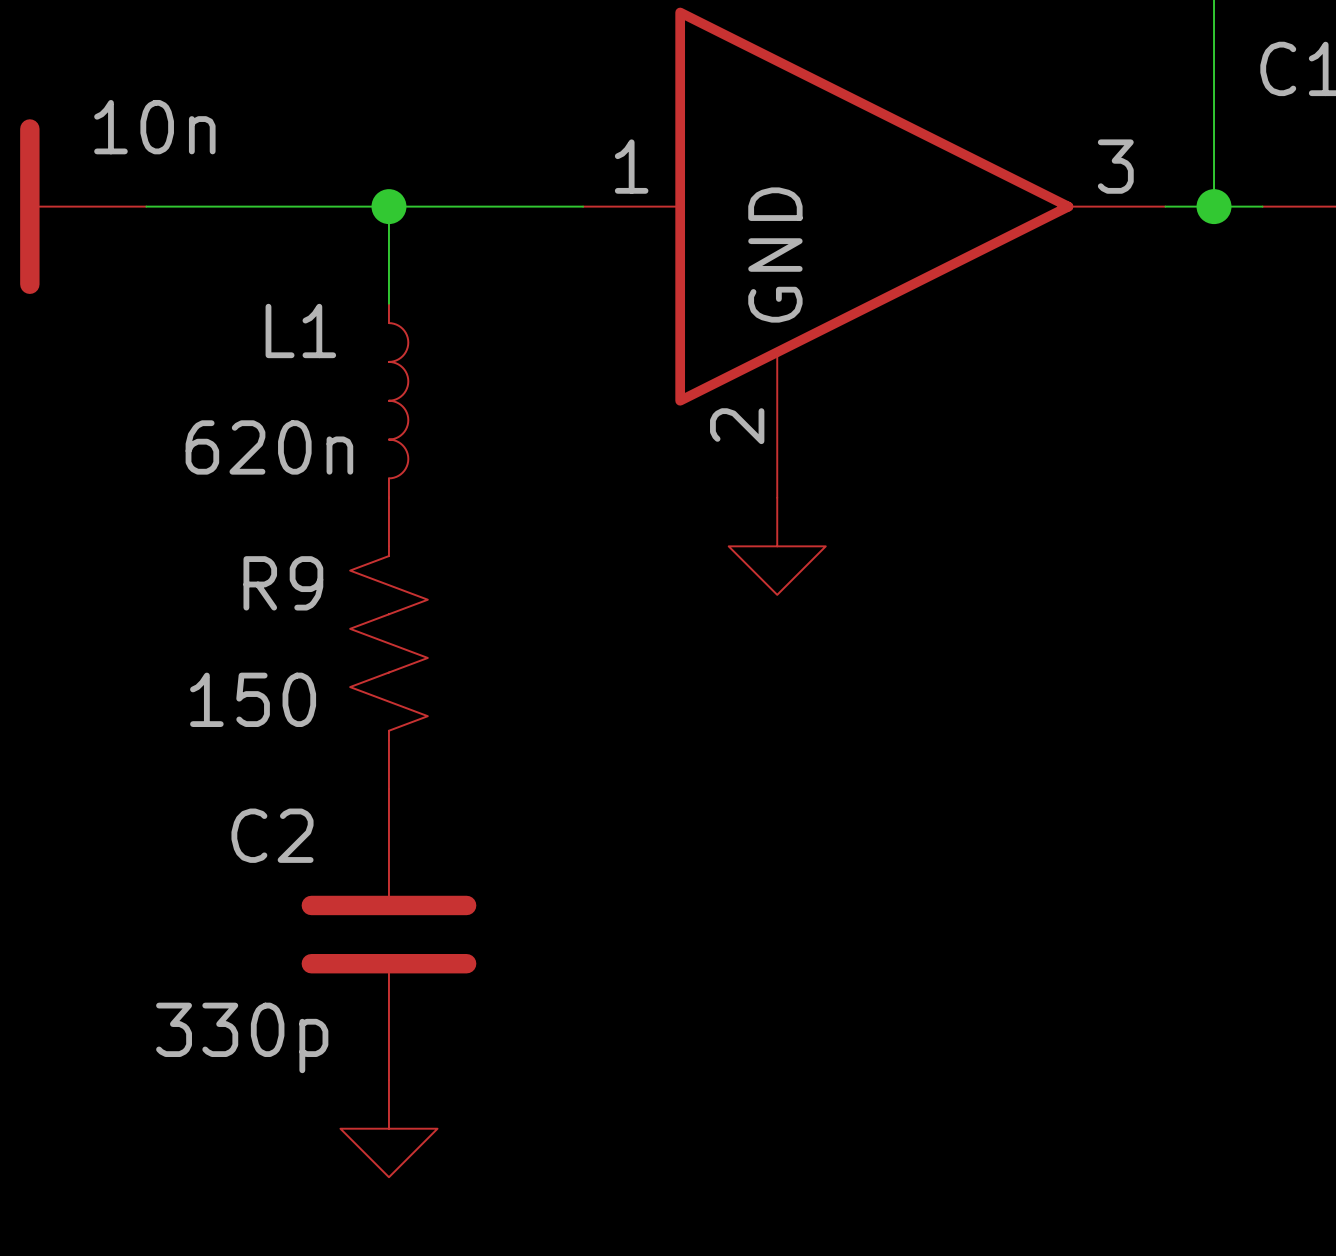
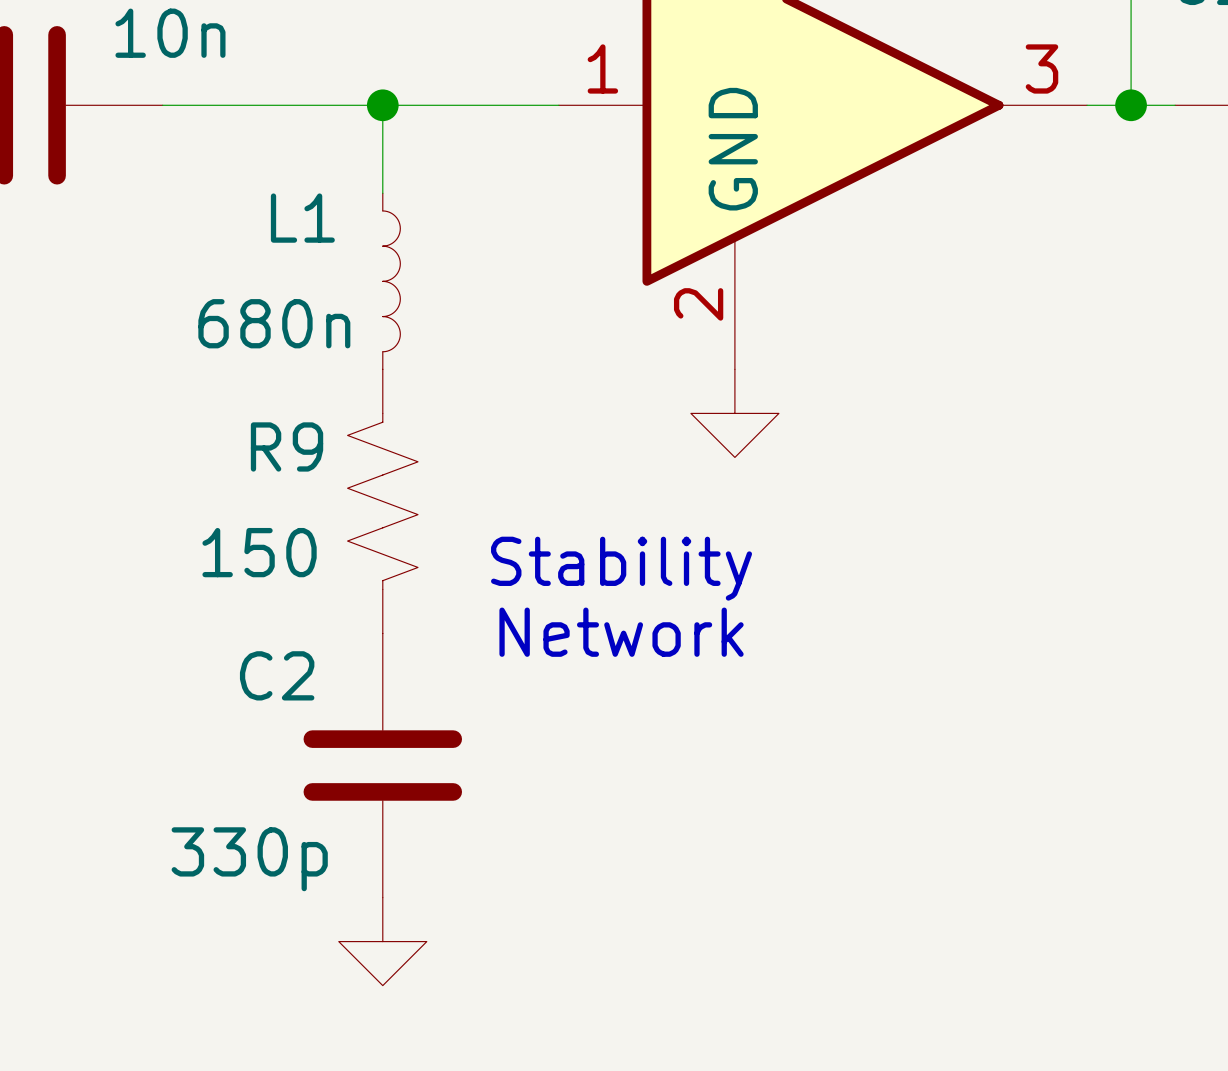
L1 value: 620n (269, 447) -> 680n (274, 323)
text: none -> Stability (621, 568)
text: none -> Network (621, 632)

